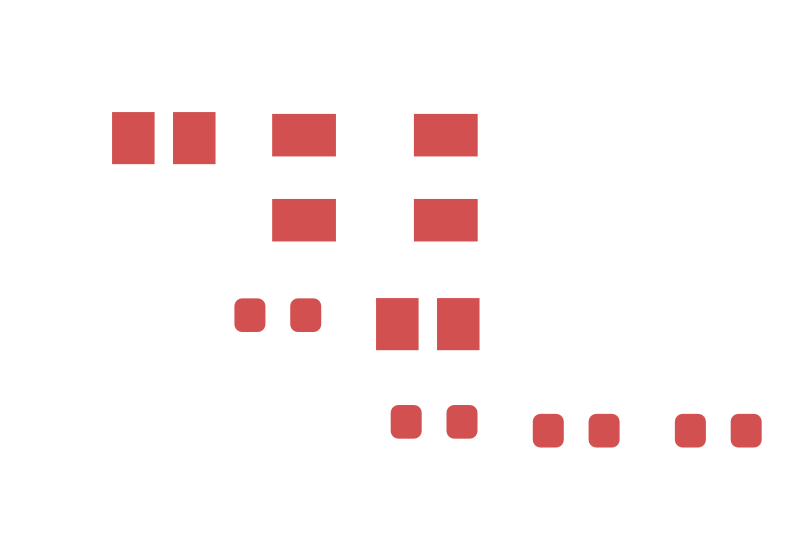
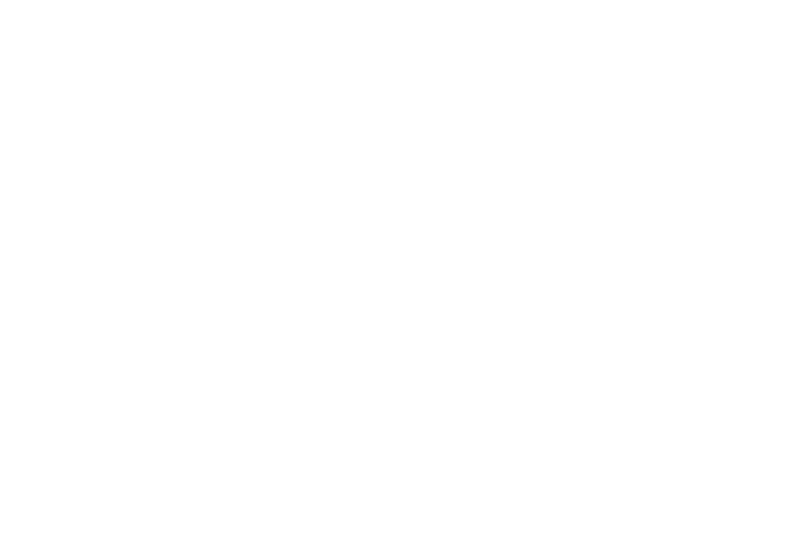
part: (163, 138) -> none
part: (374, 177) -> none
part: (277, 315) -> none
part: (427, 324) -> none
part: (434, 421) -> none
part: (576, 430) -> none
part: (718, 430) -> none

